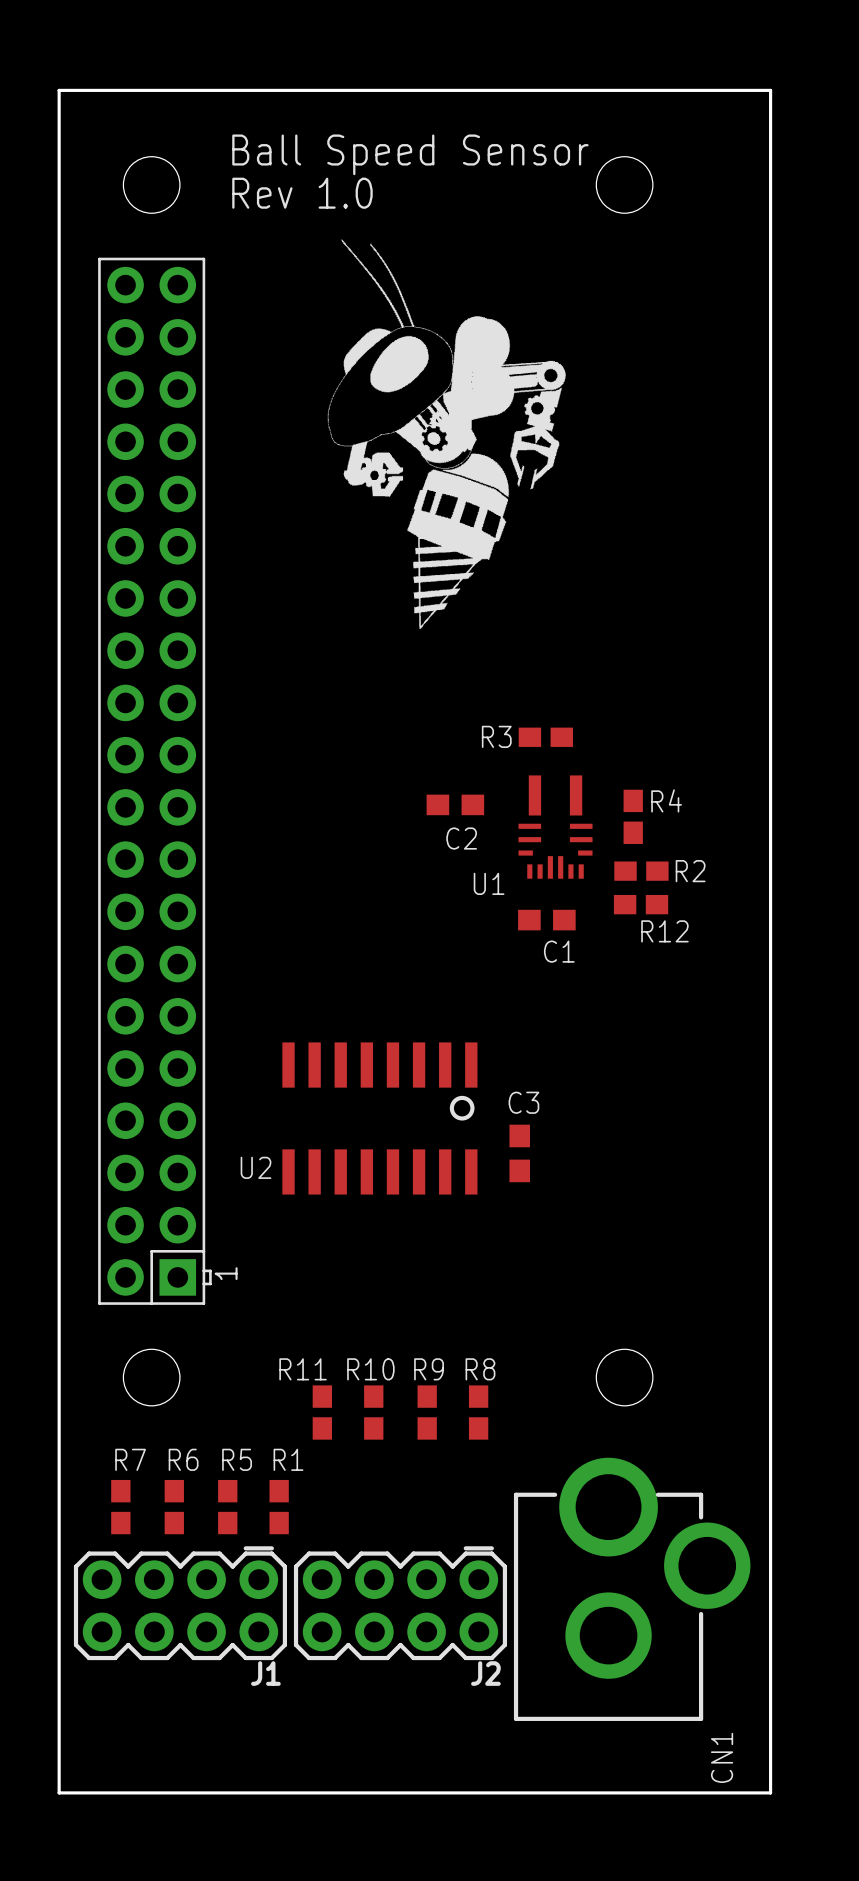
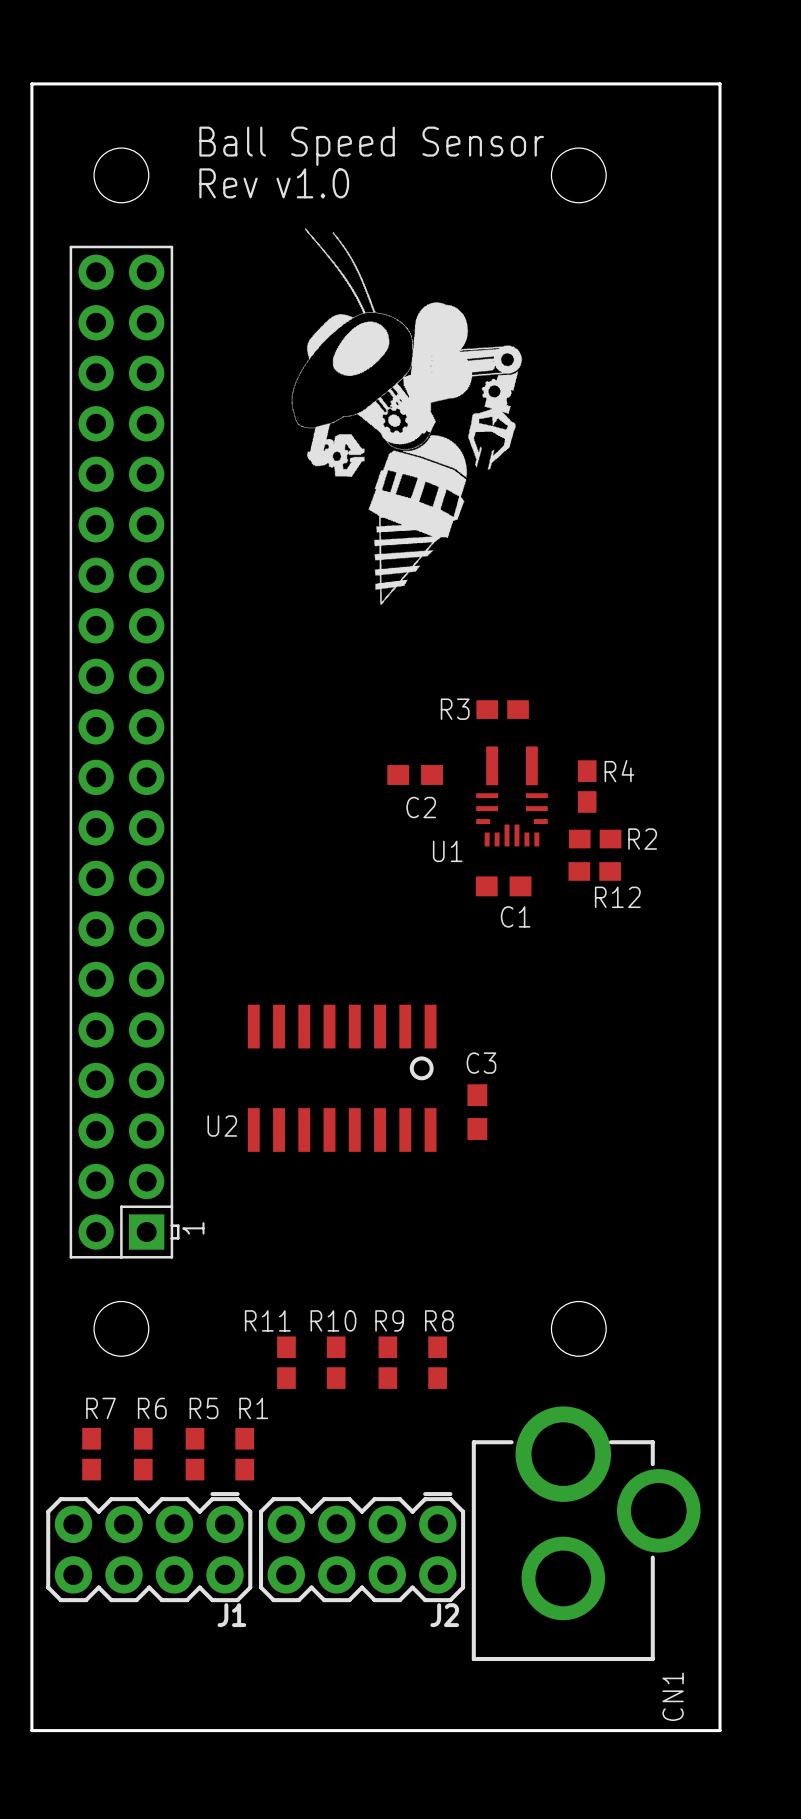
text: Rev 1.0 (302, 193) -> Rev (228, 183)
text: none -> v1.0 (312, 183)

